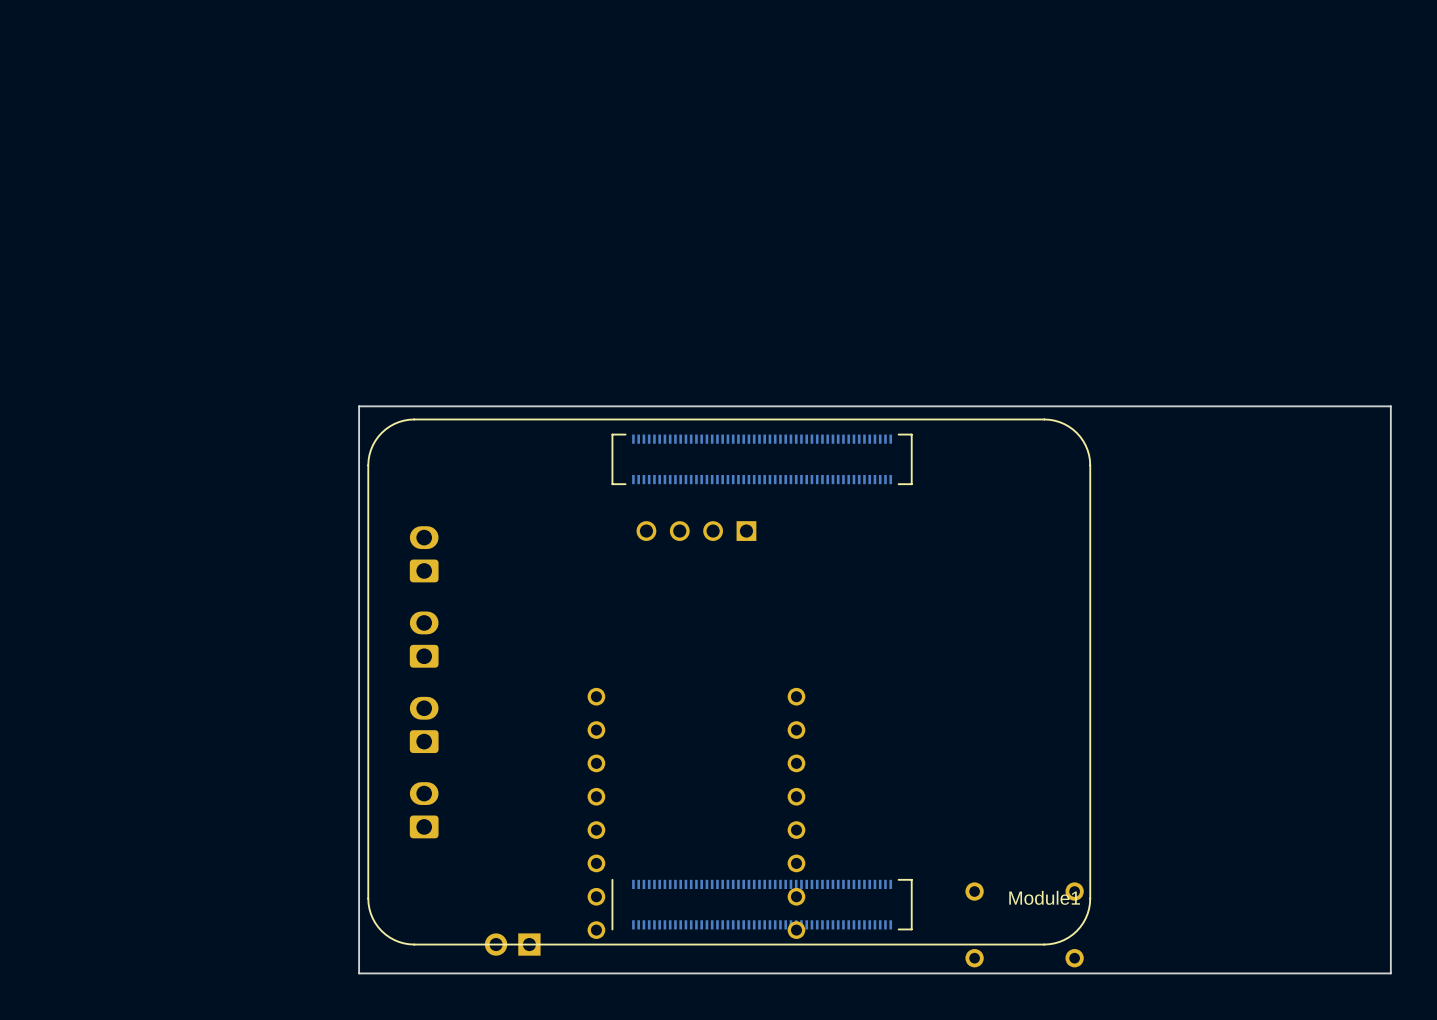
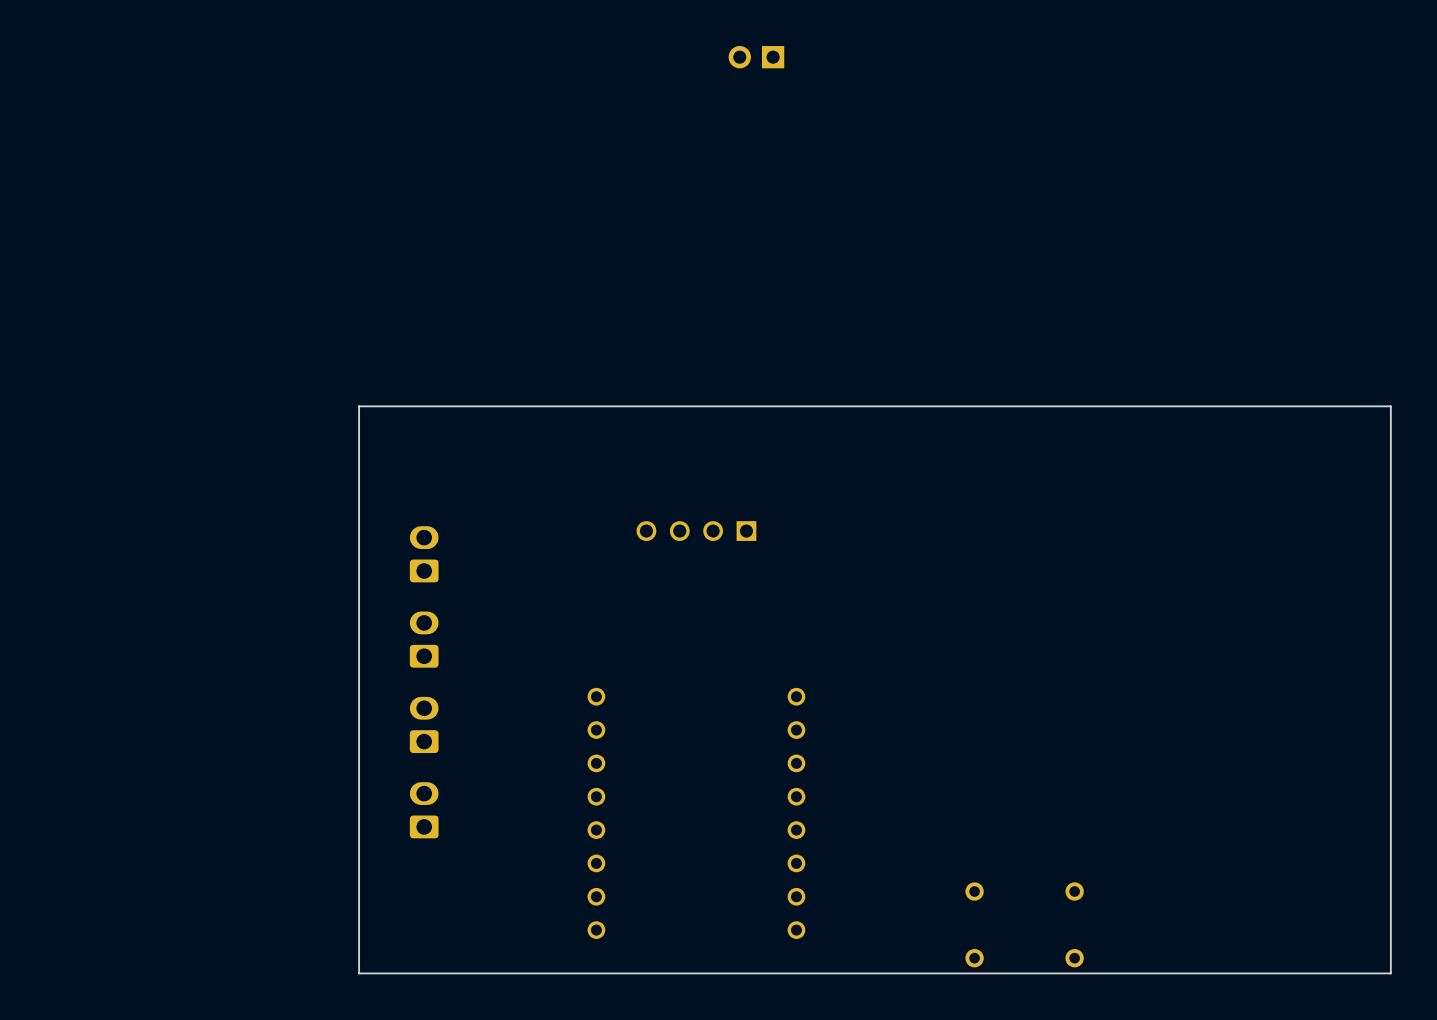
part: none -> (756, 57)
Module1: (729, 682) -> none
part: (512, 944) -> none

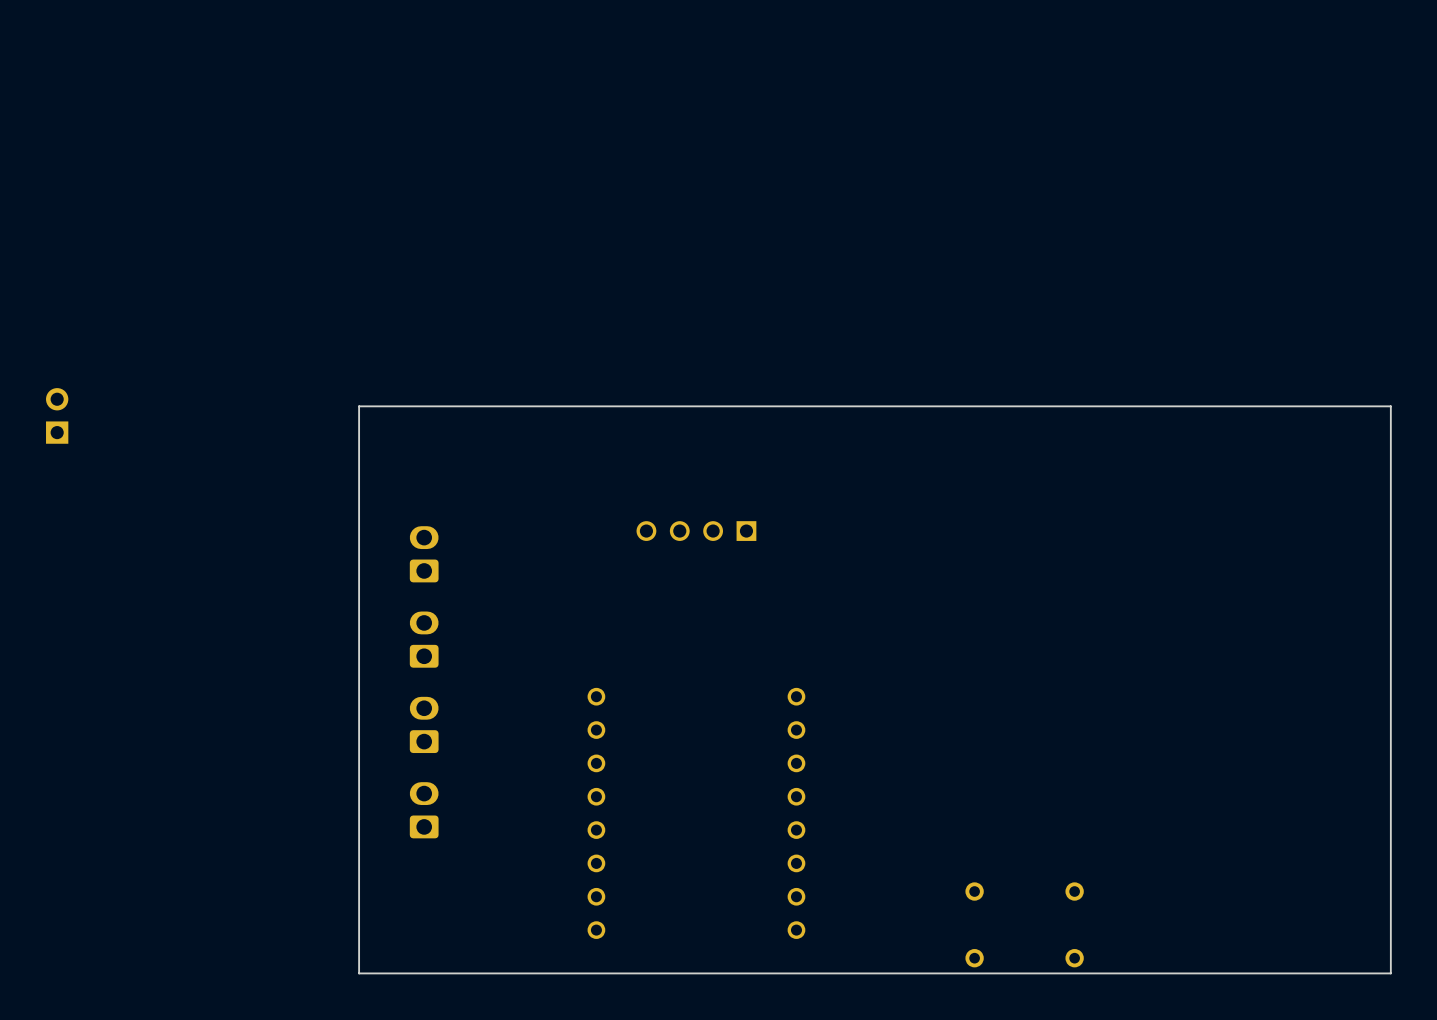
part: (756, 57) -> none
part: none -> (57, 415)

